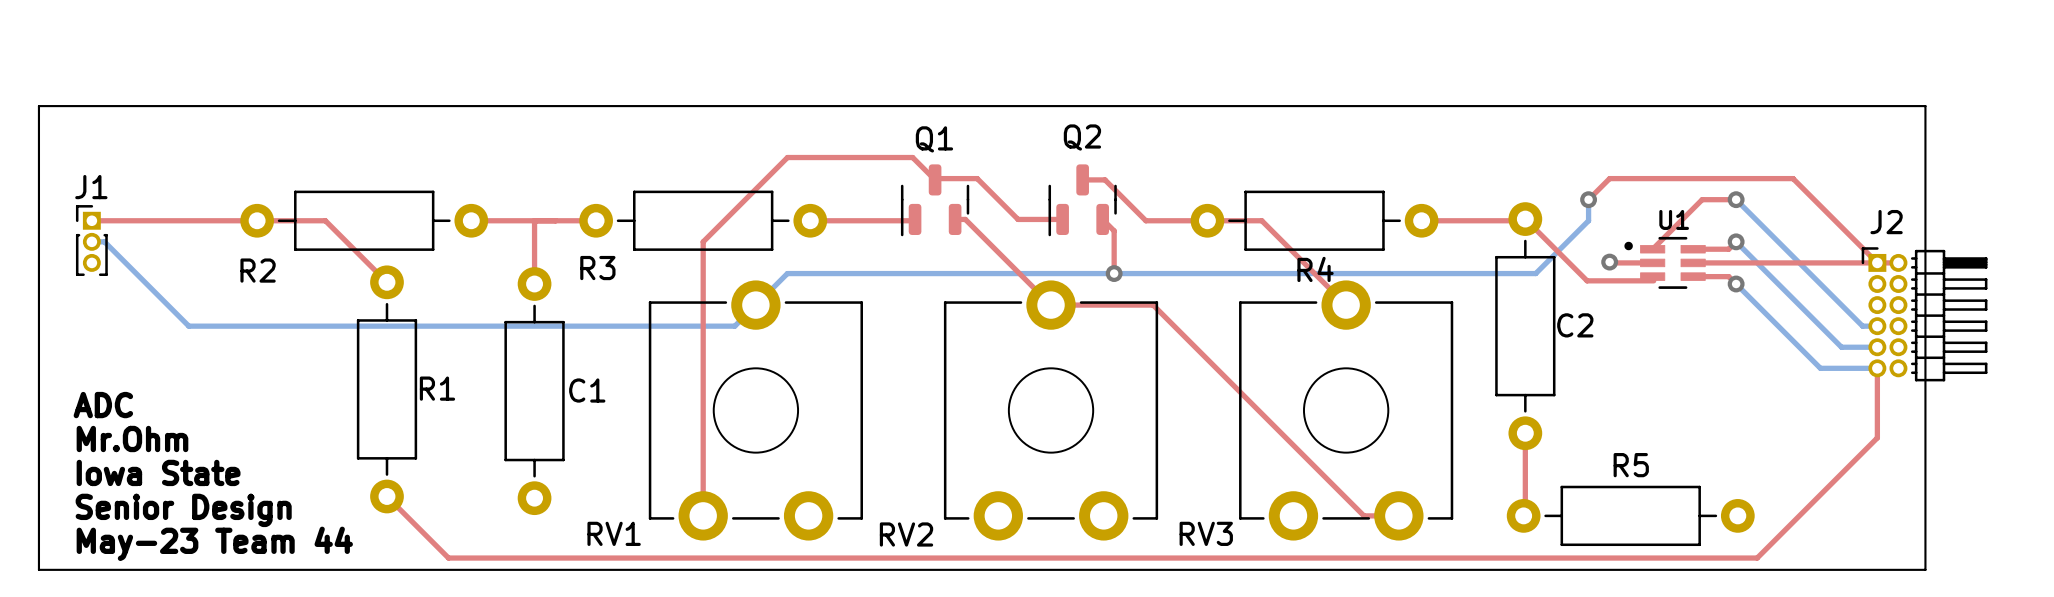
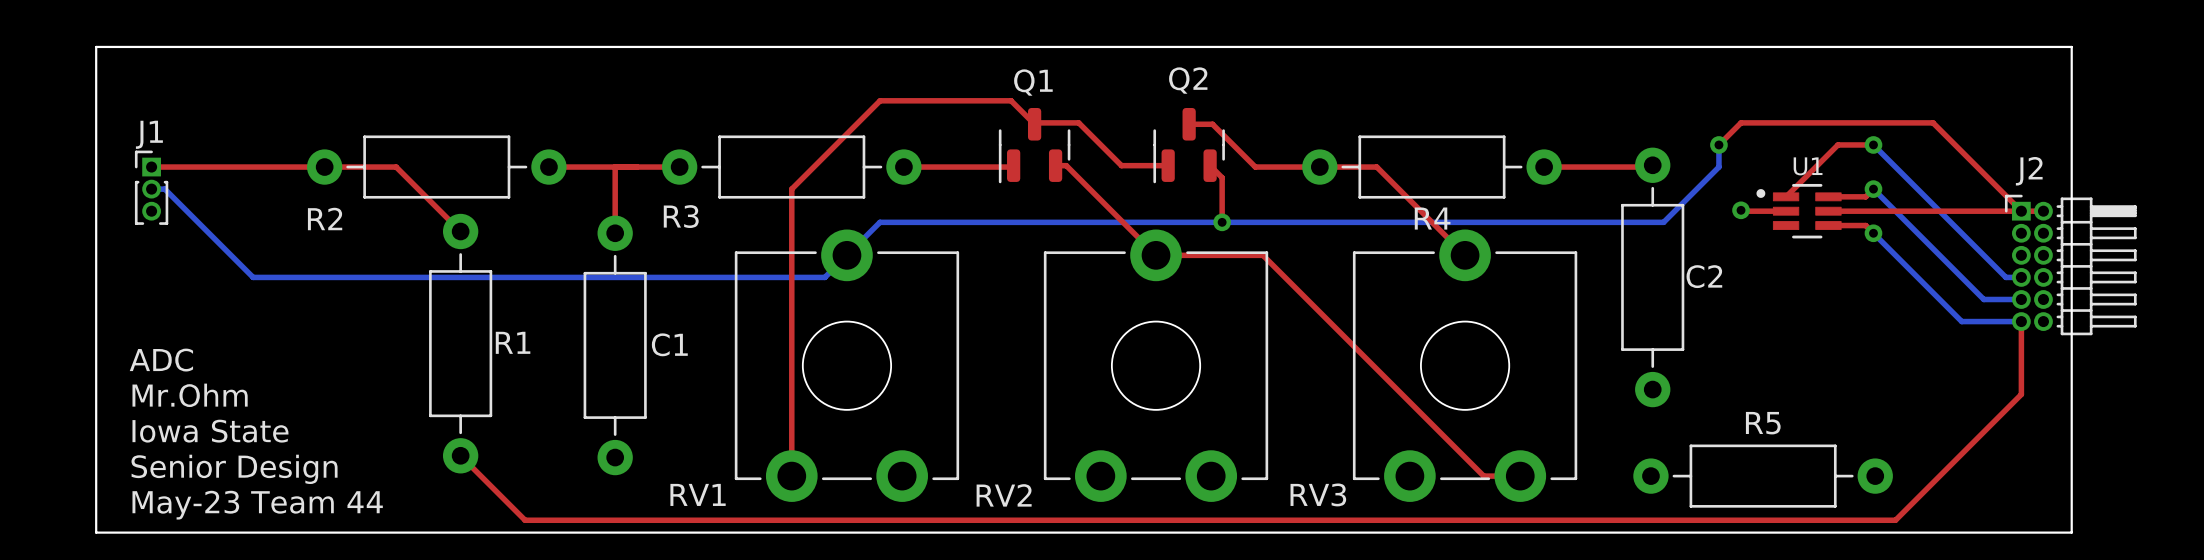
top track: (1525, 219) (1587, 280) (1653, 280) -> none
top track: (1525, 433) (1525, 514) (1523, 515) -> none

